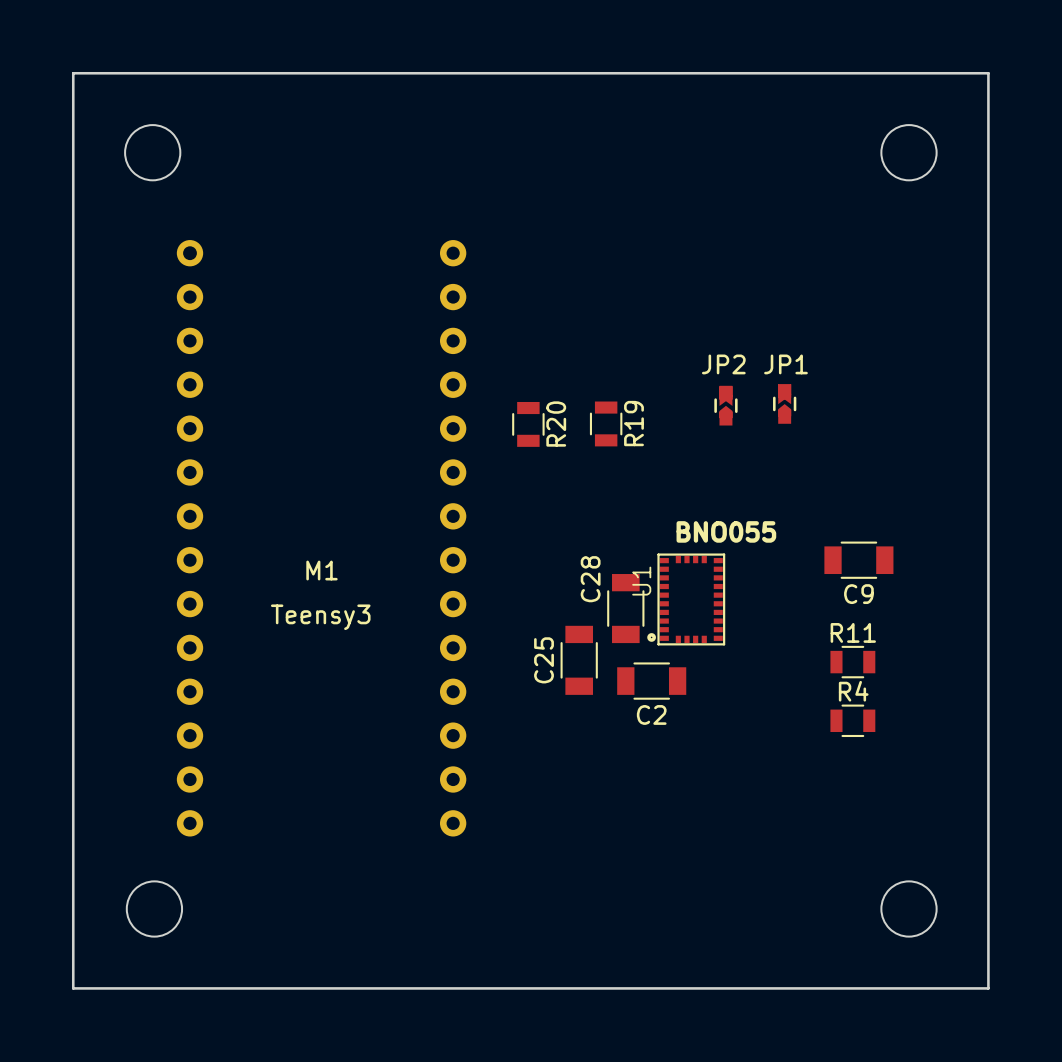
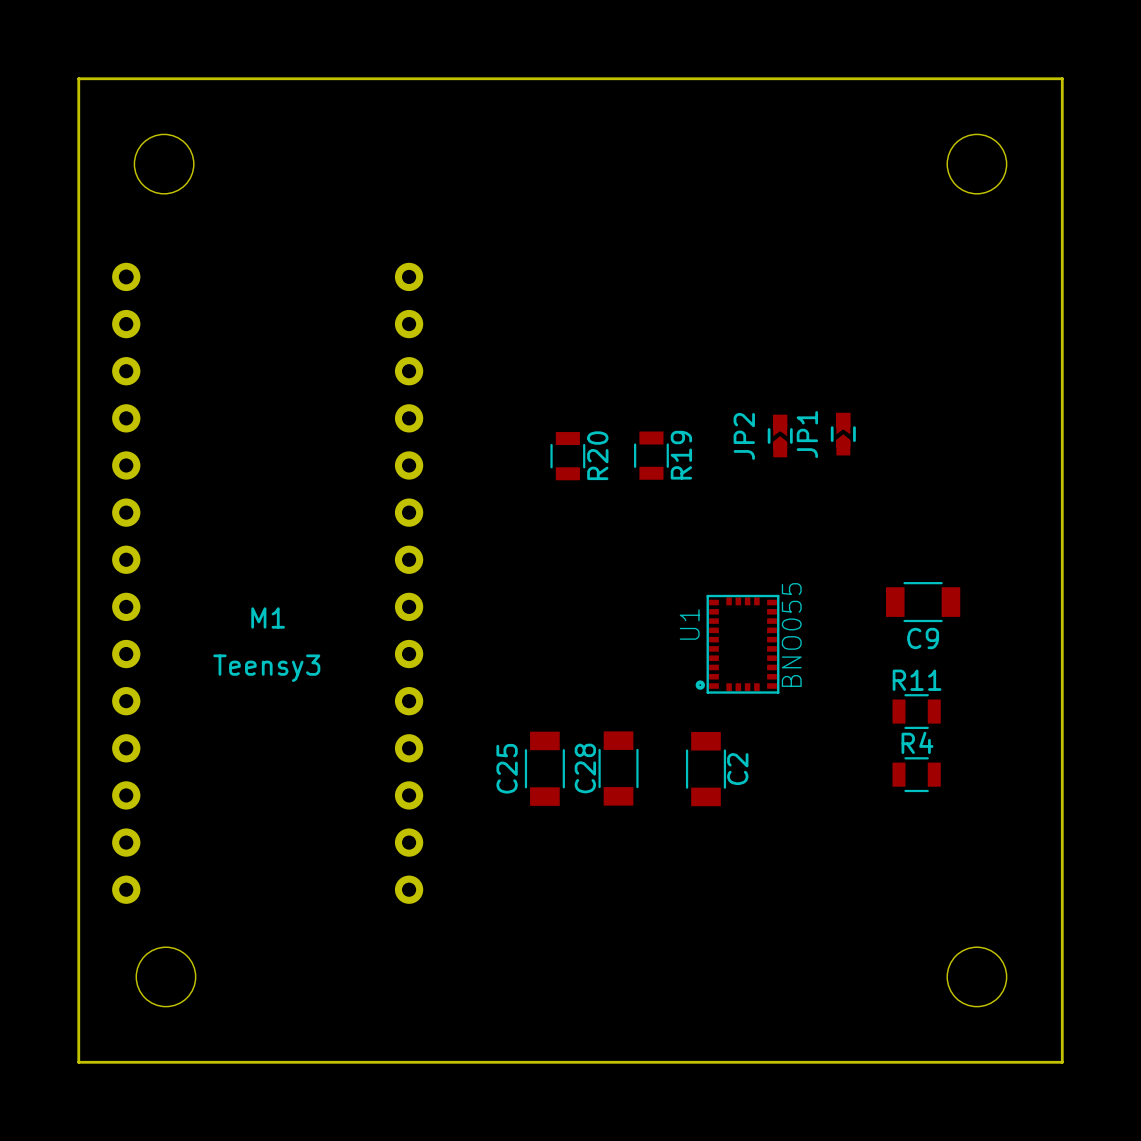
JP2 name rotation: 0° (723, 364) -> 90° counterclockwise (744, 436)
JP1 name rotation: 0° (785, 364) -> 90° counterclockwise (807, 434)
U1 value rotation: 0° (726, 531) -> 90° counterclockwise (791, 635)
M1 position: (321, 538) -> (267, 583)
C28 name position: C28 (590, 579) -> C28 (585, 768)
C28 position: (625, 608) -> (618, 768)
C25 position: (579, 660) -> (544, 768)
C2 rotation: 0° (651, 681) -> 90° clockwise (705, 769)
C2 name position: C2 (651, 714) -> C2 (737, 769)

